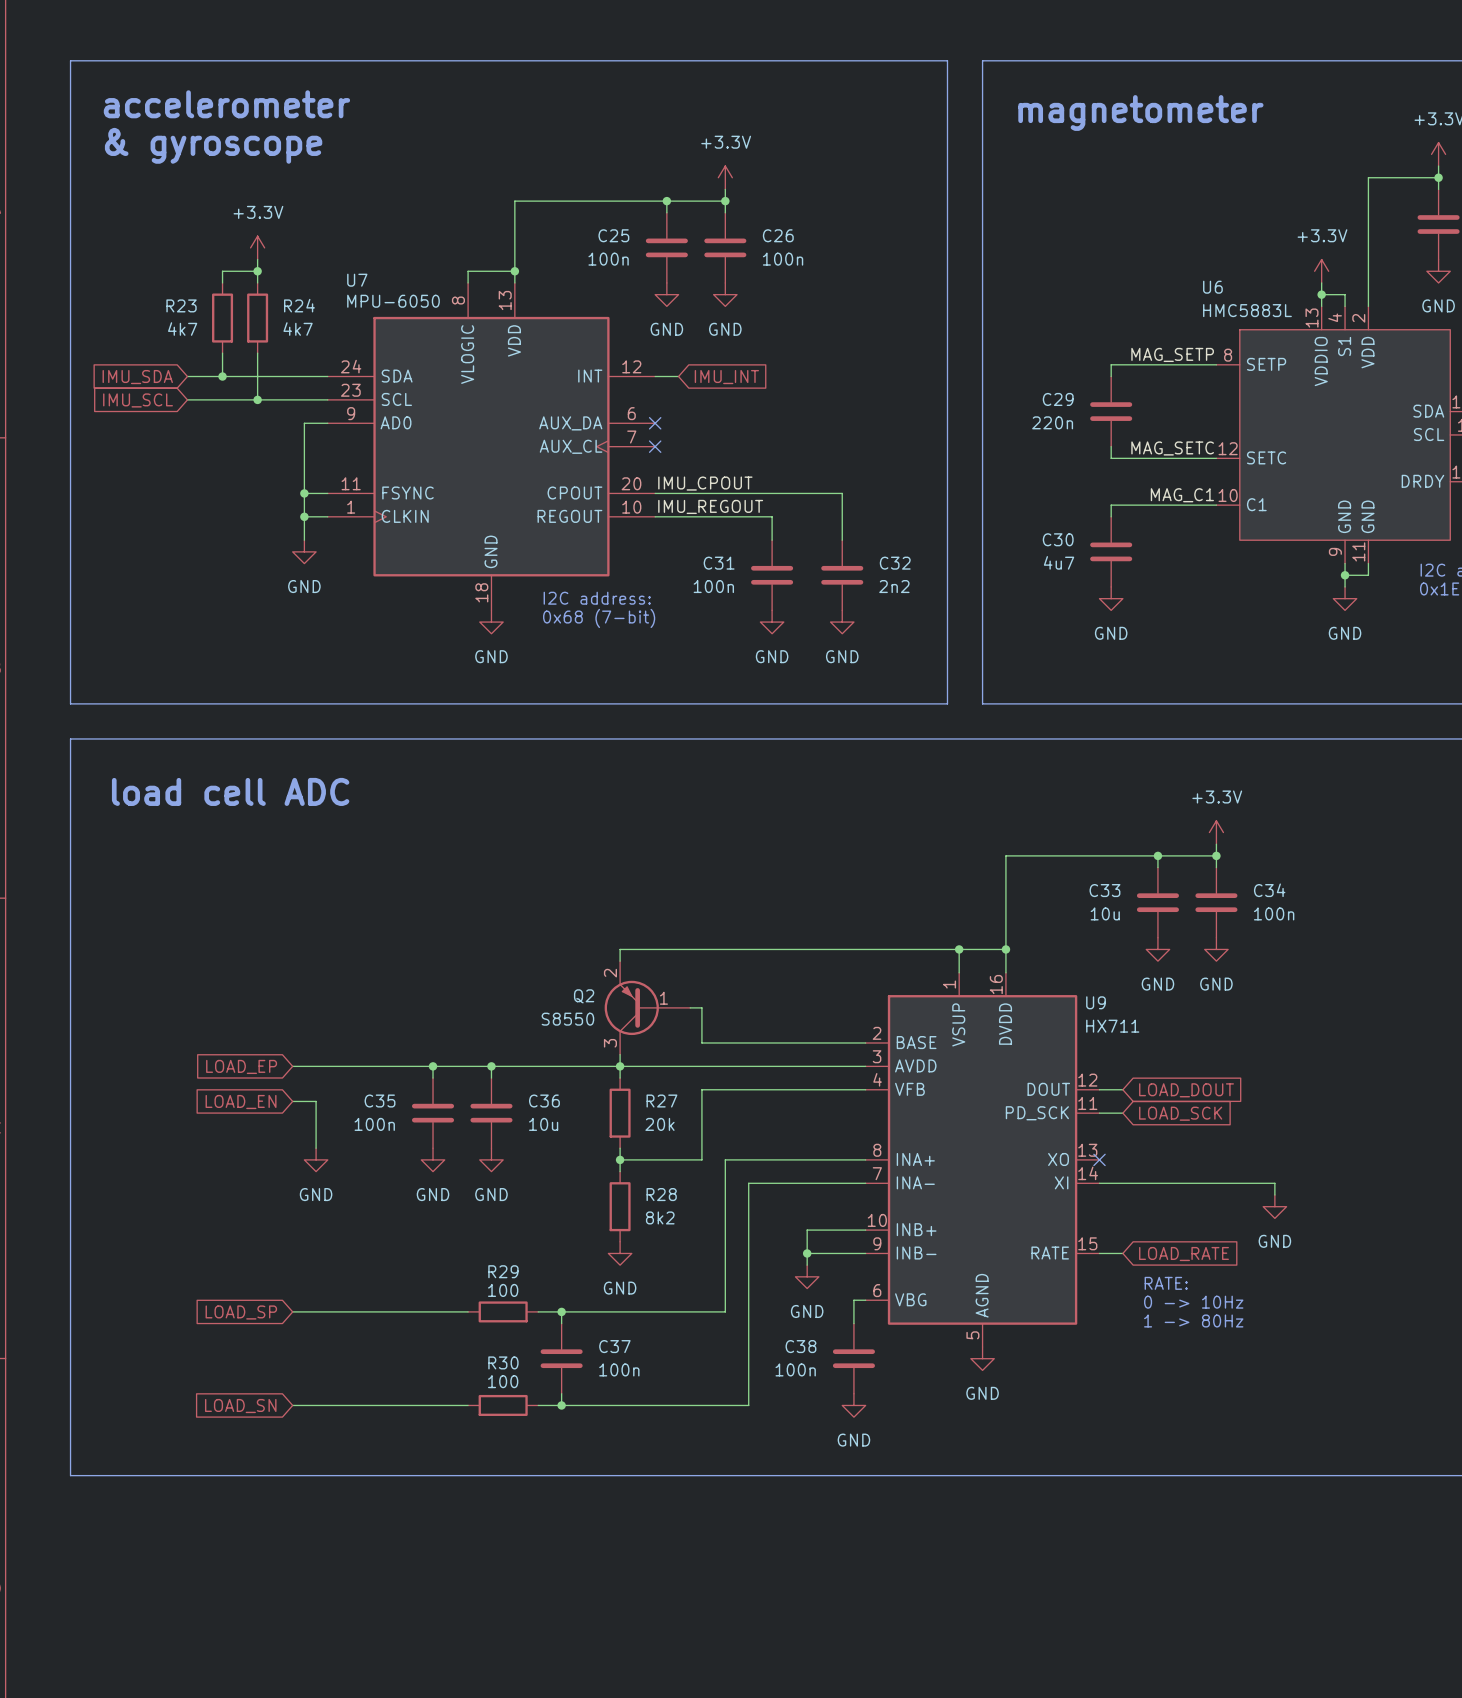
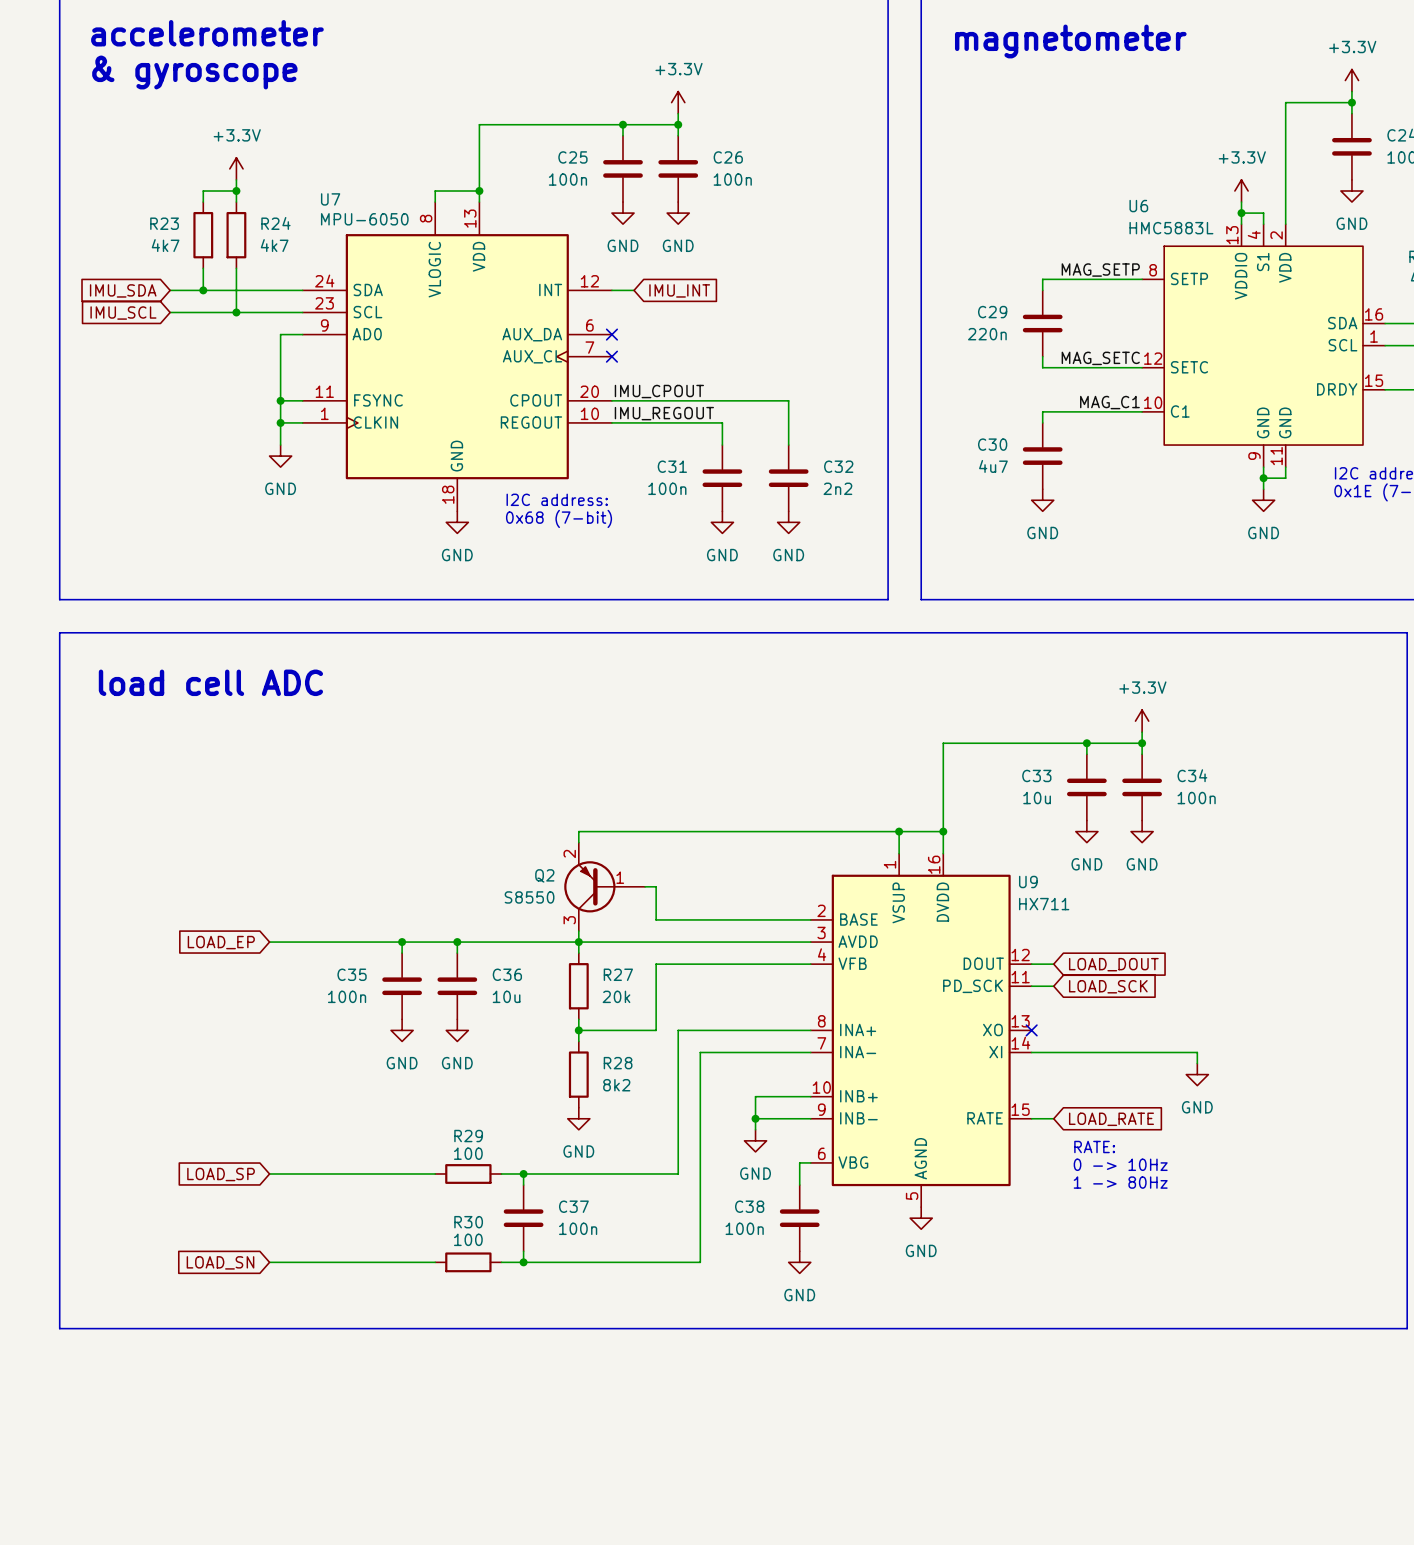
wire: (292, 1101) (316, 1101) (316, 1148) -> none
global label: LOAD_EN (241, 1102) -> none
power symbol: GND (316, 1159) -> none

